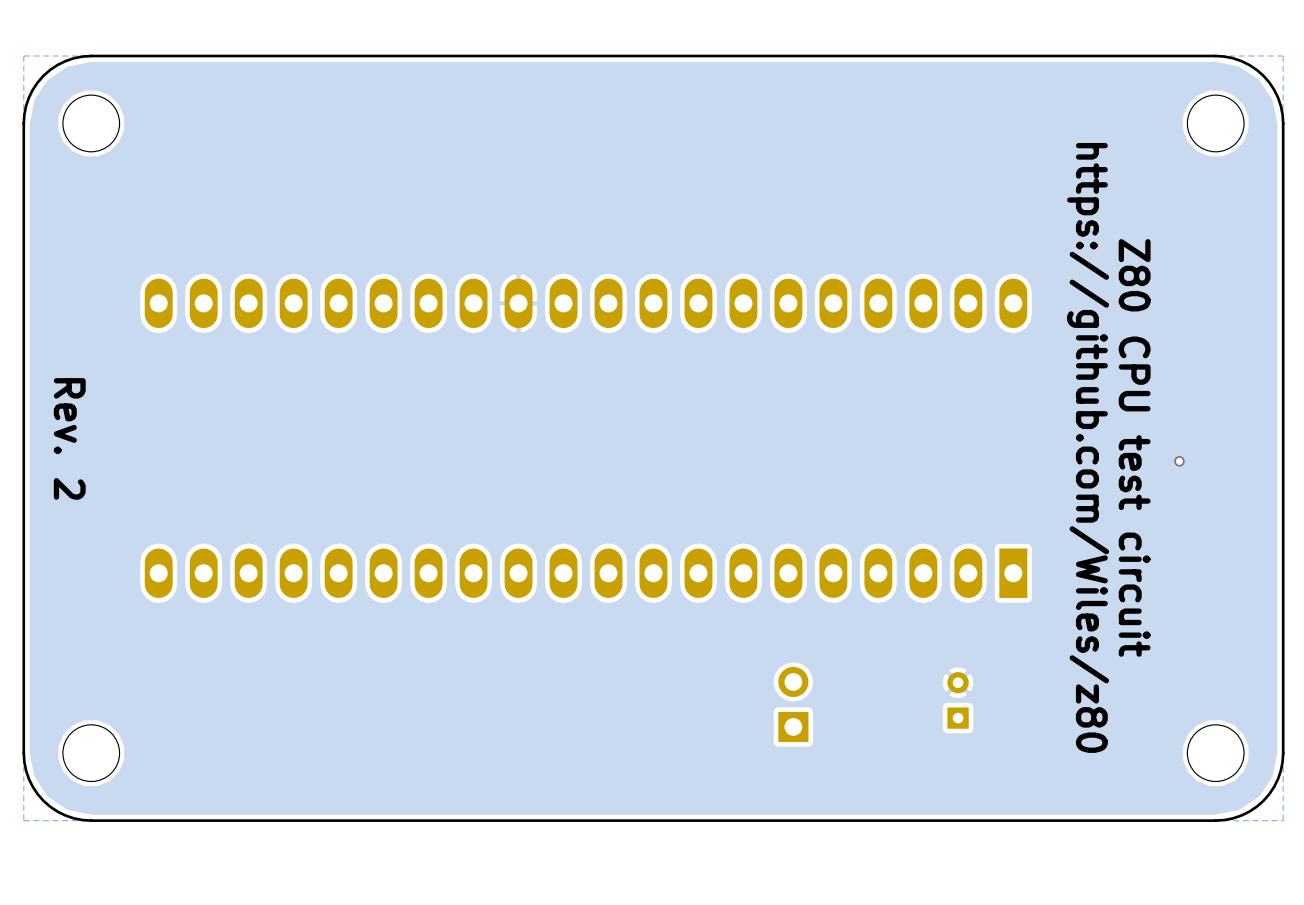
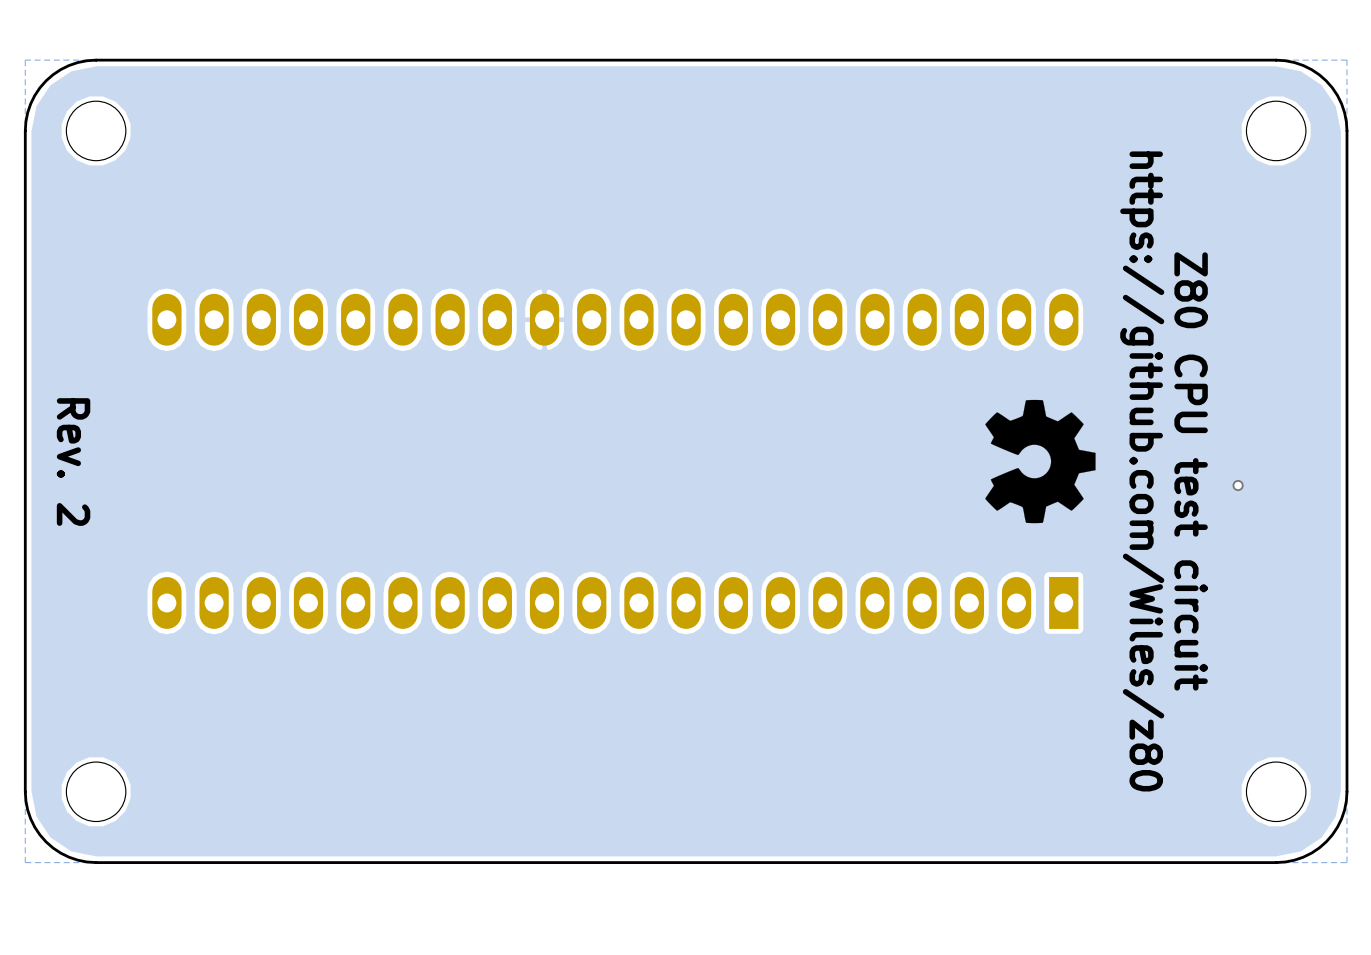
drawing: none -> [985, 399, 1096, 524]
part: (958, 700) -> none
part: (793, 704) -> none

